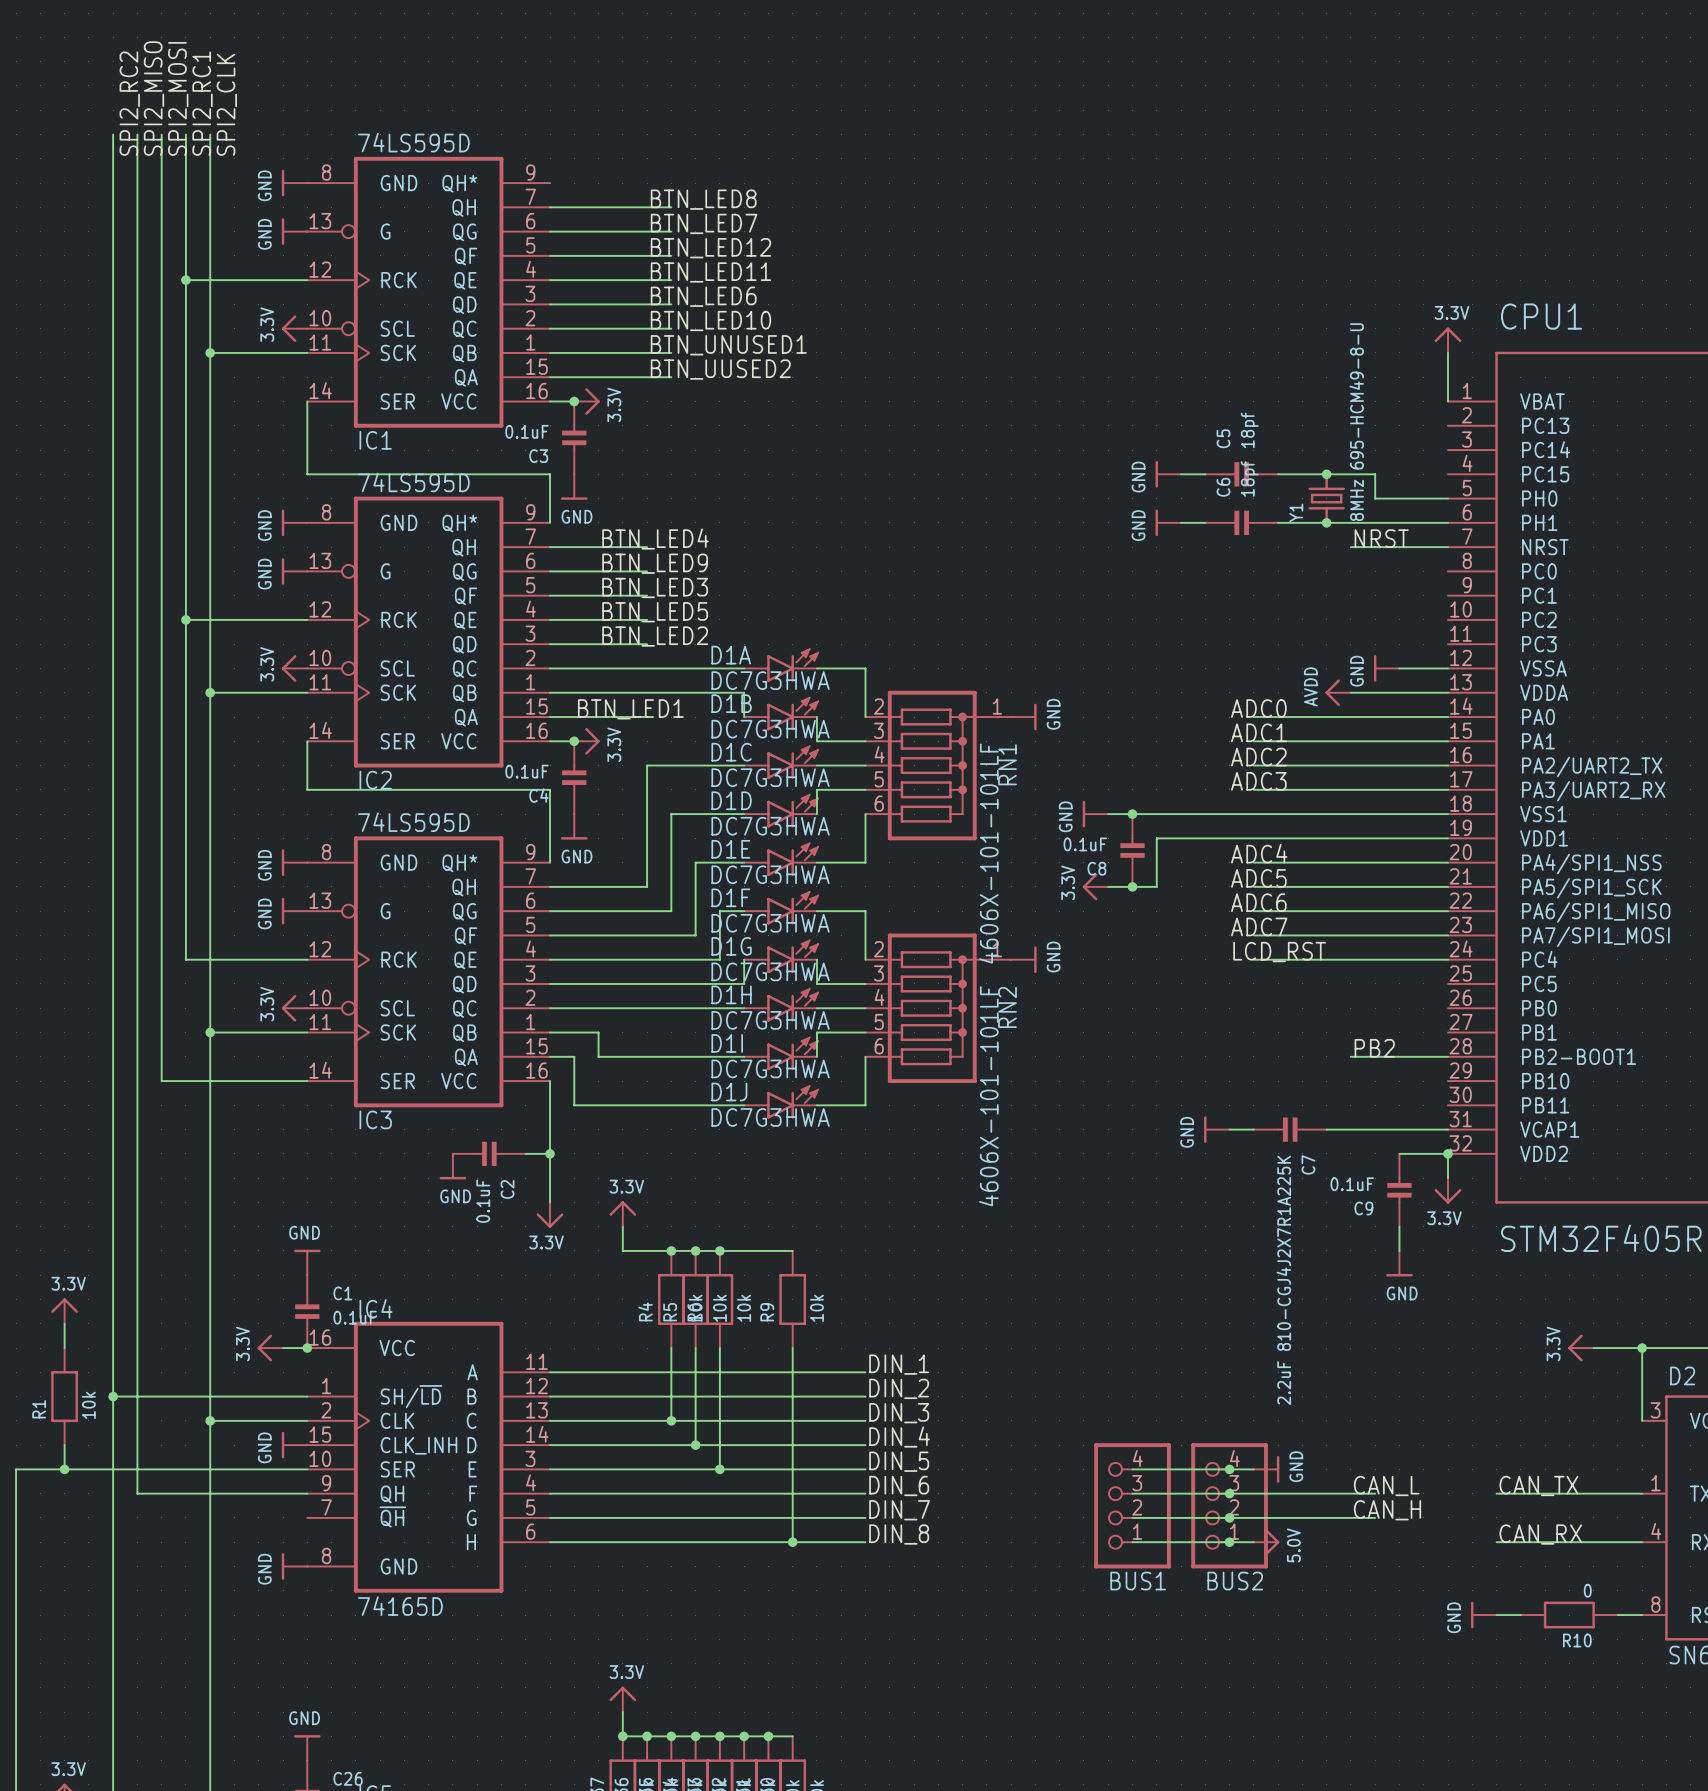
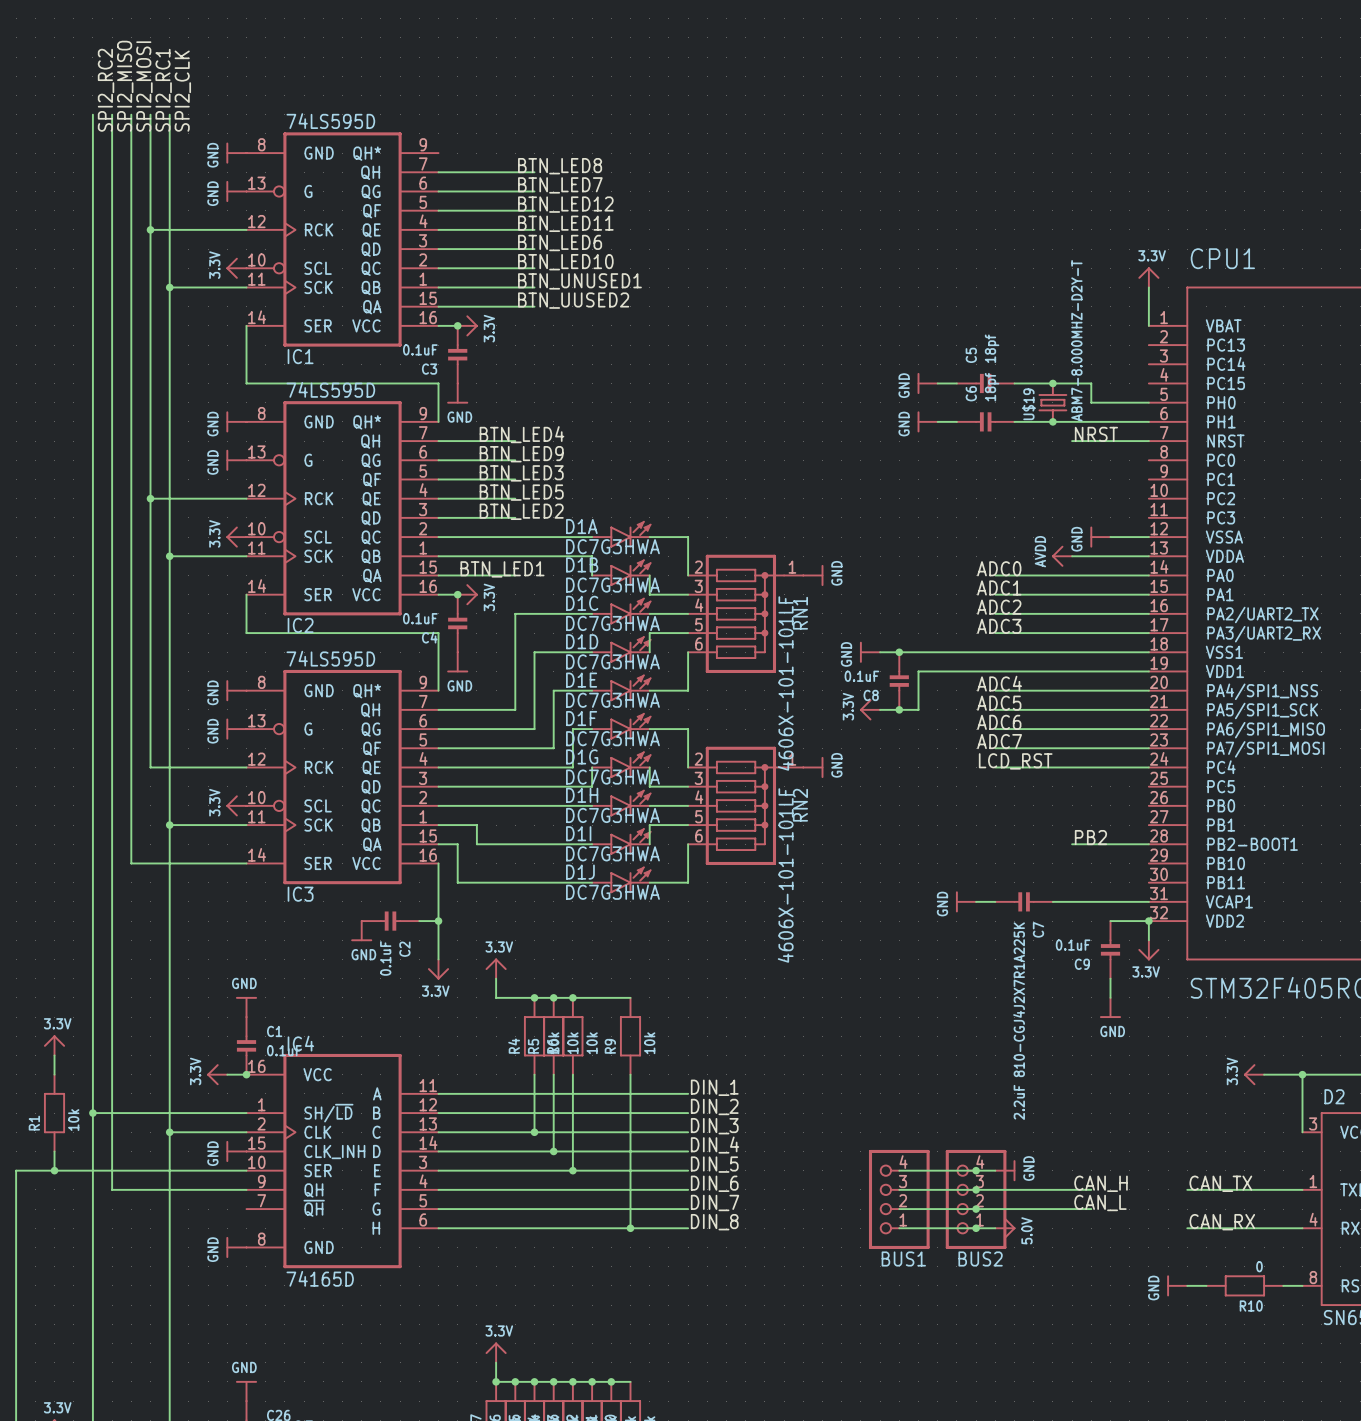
Y1 value: 8MHz 695-HCM49-8-U (1356, 422) -> ABM7-8.000MHZ-D2Y-T (1076, 340)
Y1 name: Y1 (1296, 512) -> U$19 (1028, 404)
label: CAN_L (1386, 1485) -> CAN_H (1101, 1183)
label: CAN_H (1387, 1510) -> CAN_L (1100, 1202)

